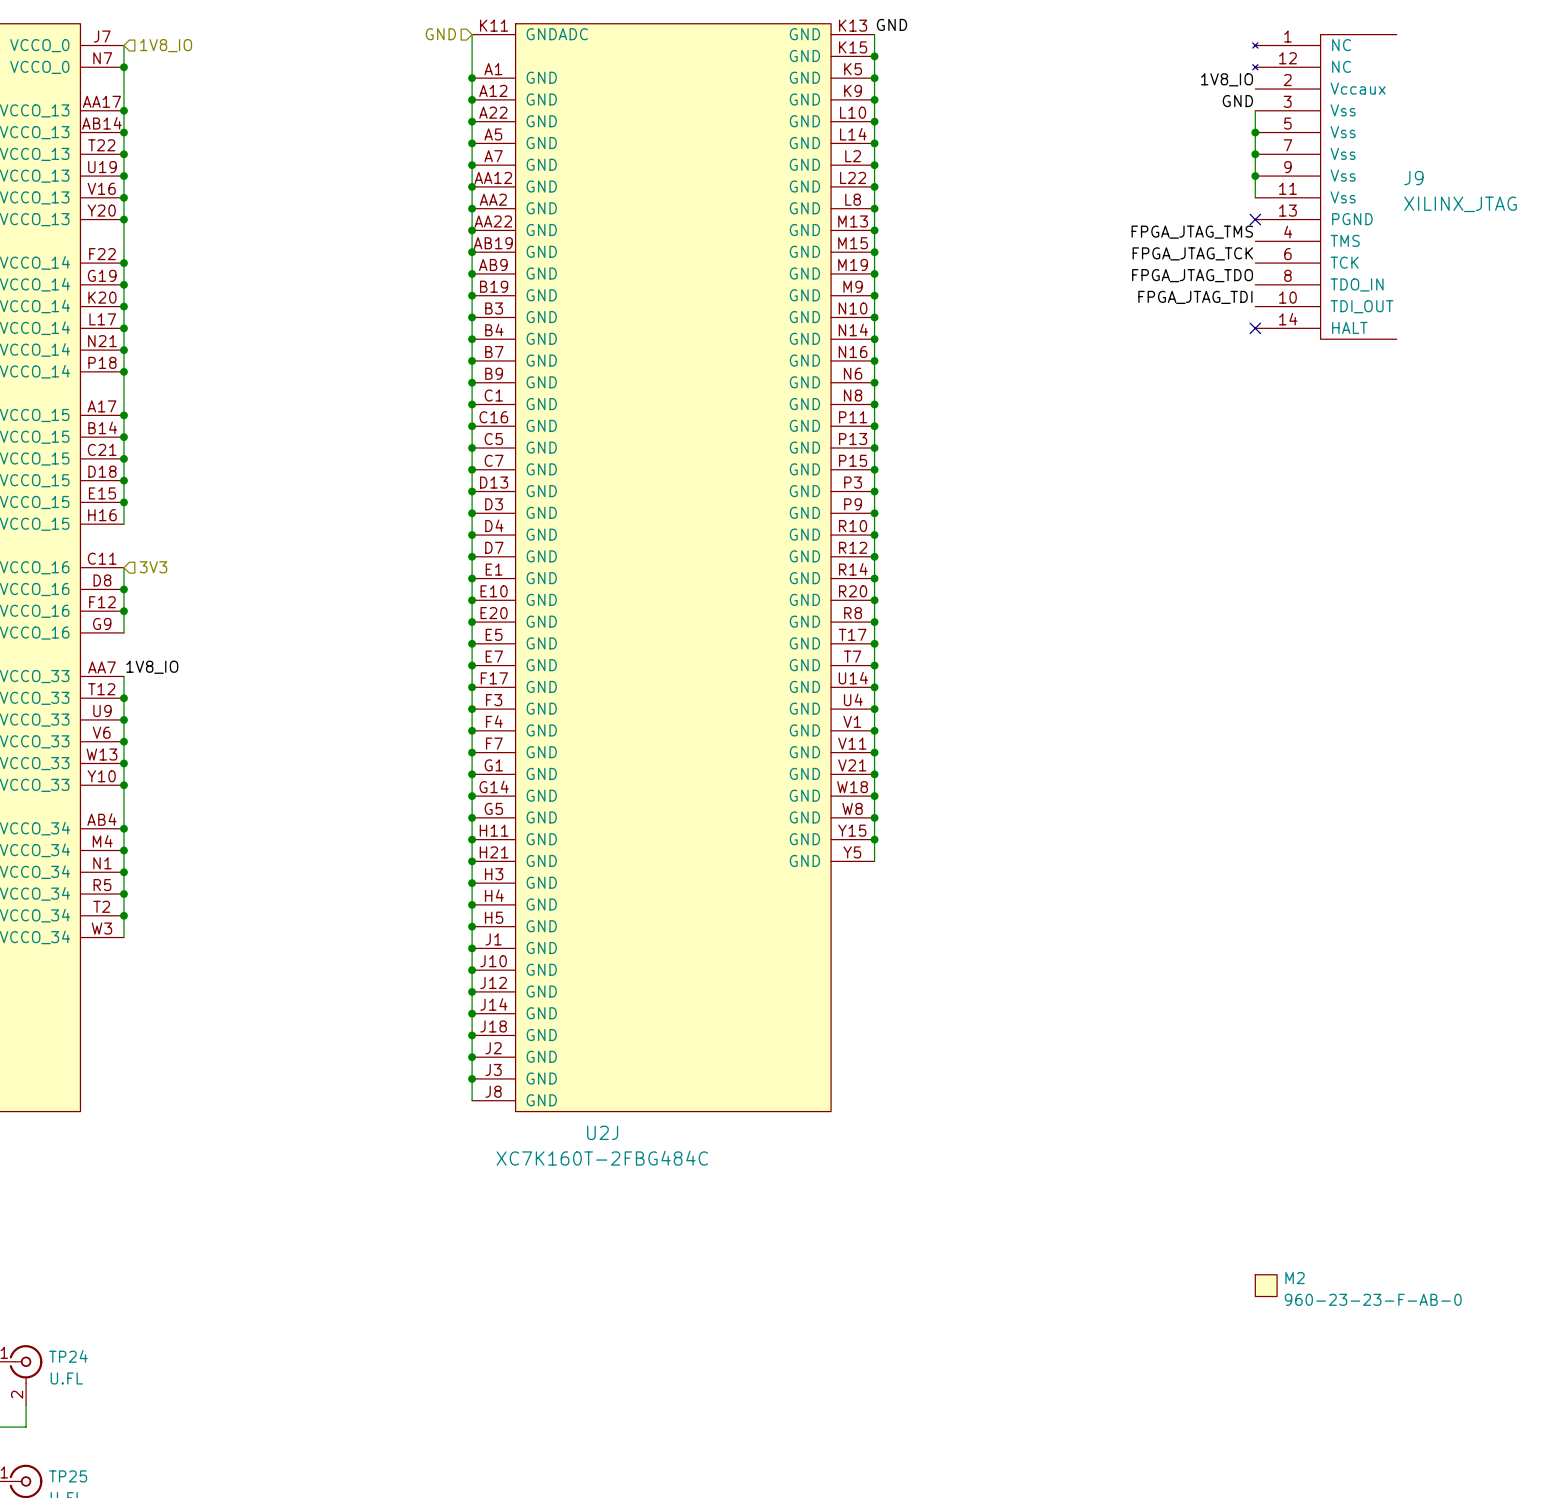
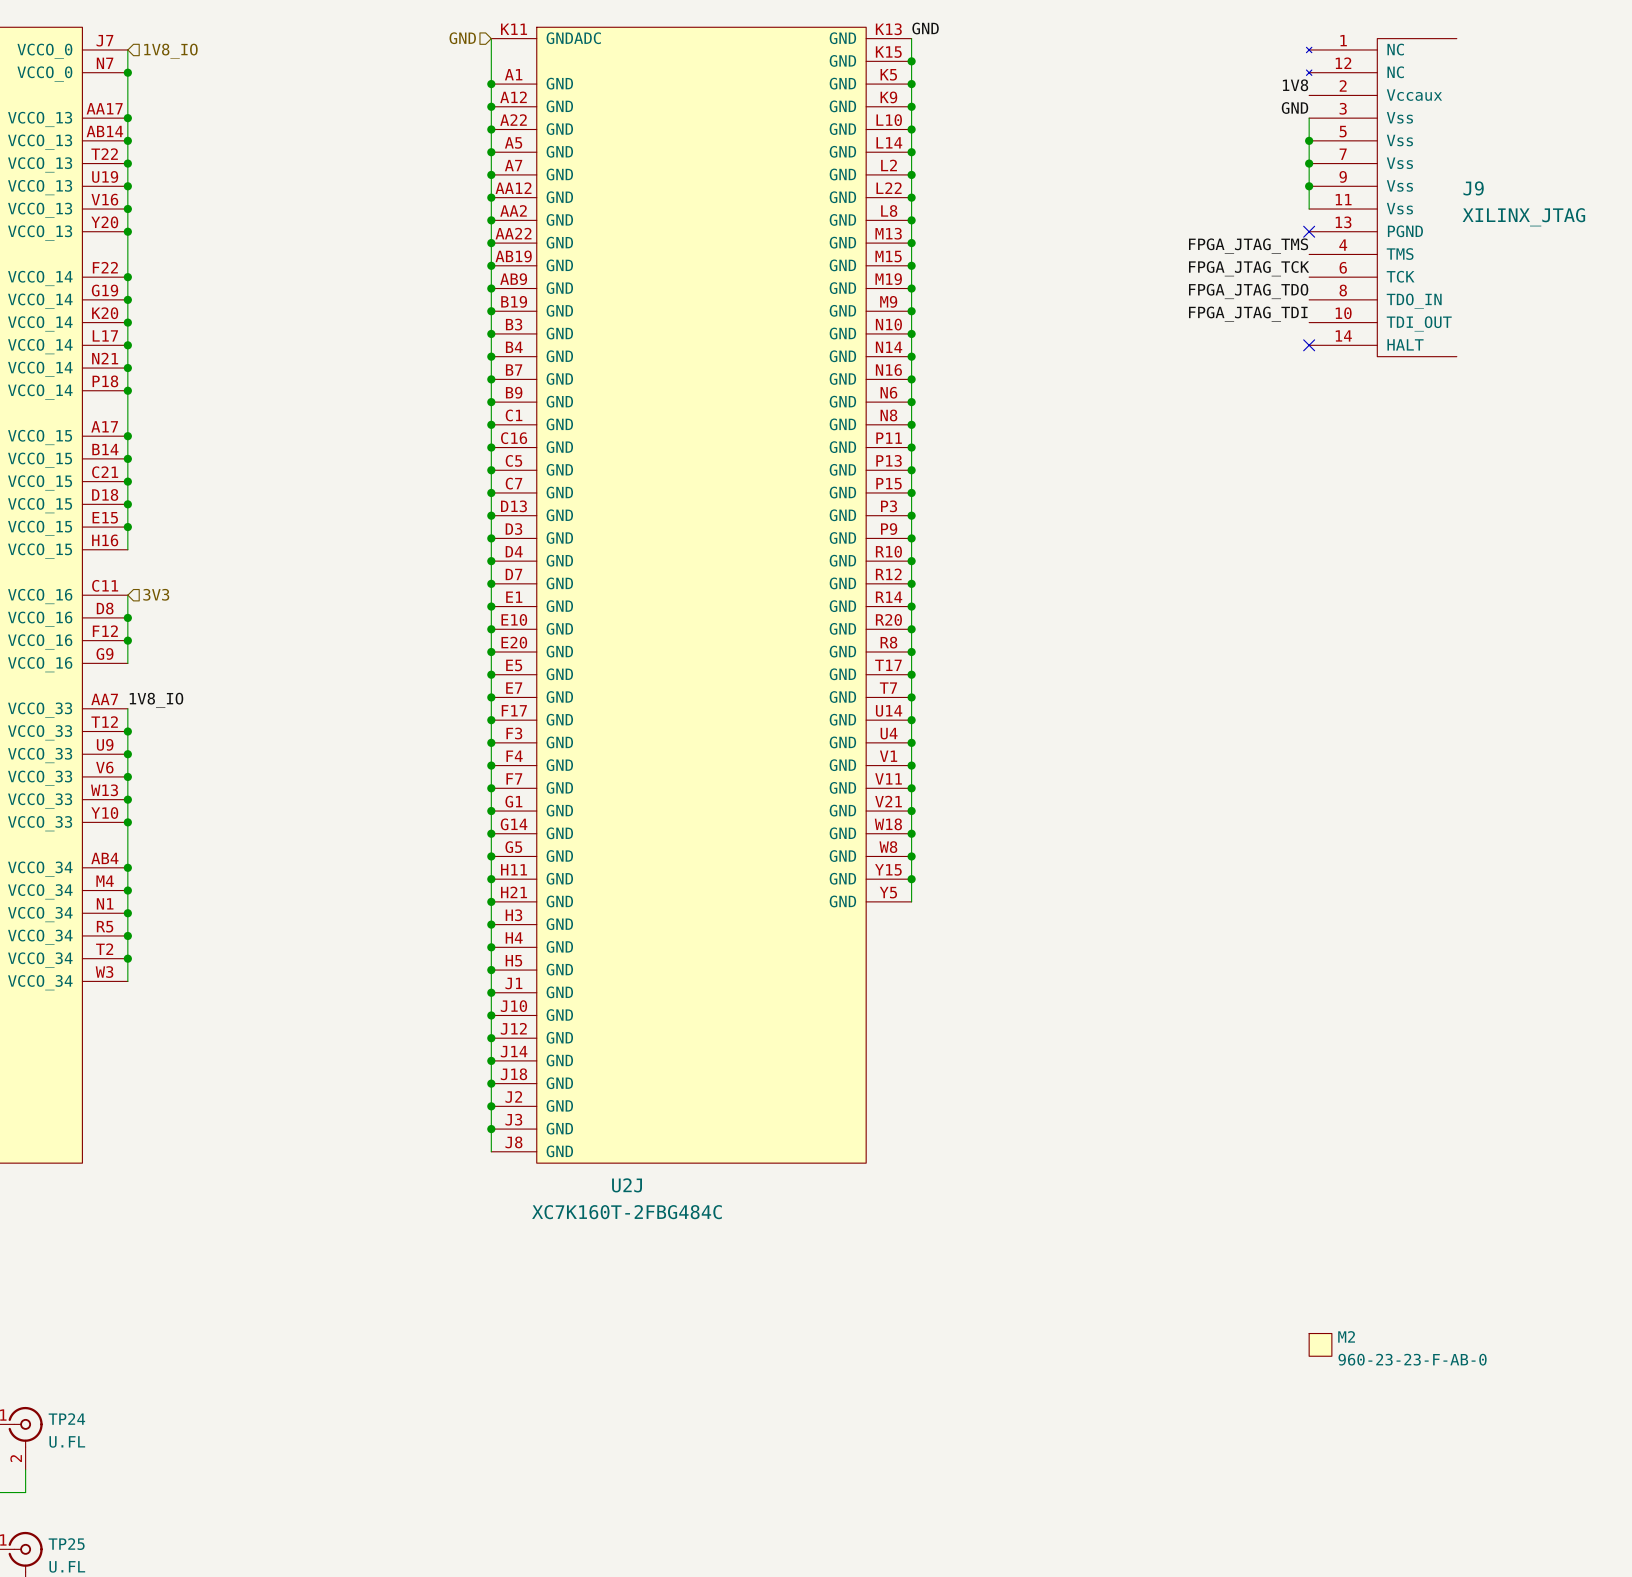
label: 1V8_IO (1227, 79) -> 1V8 (1295, 85)

